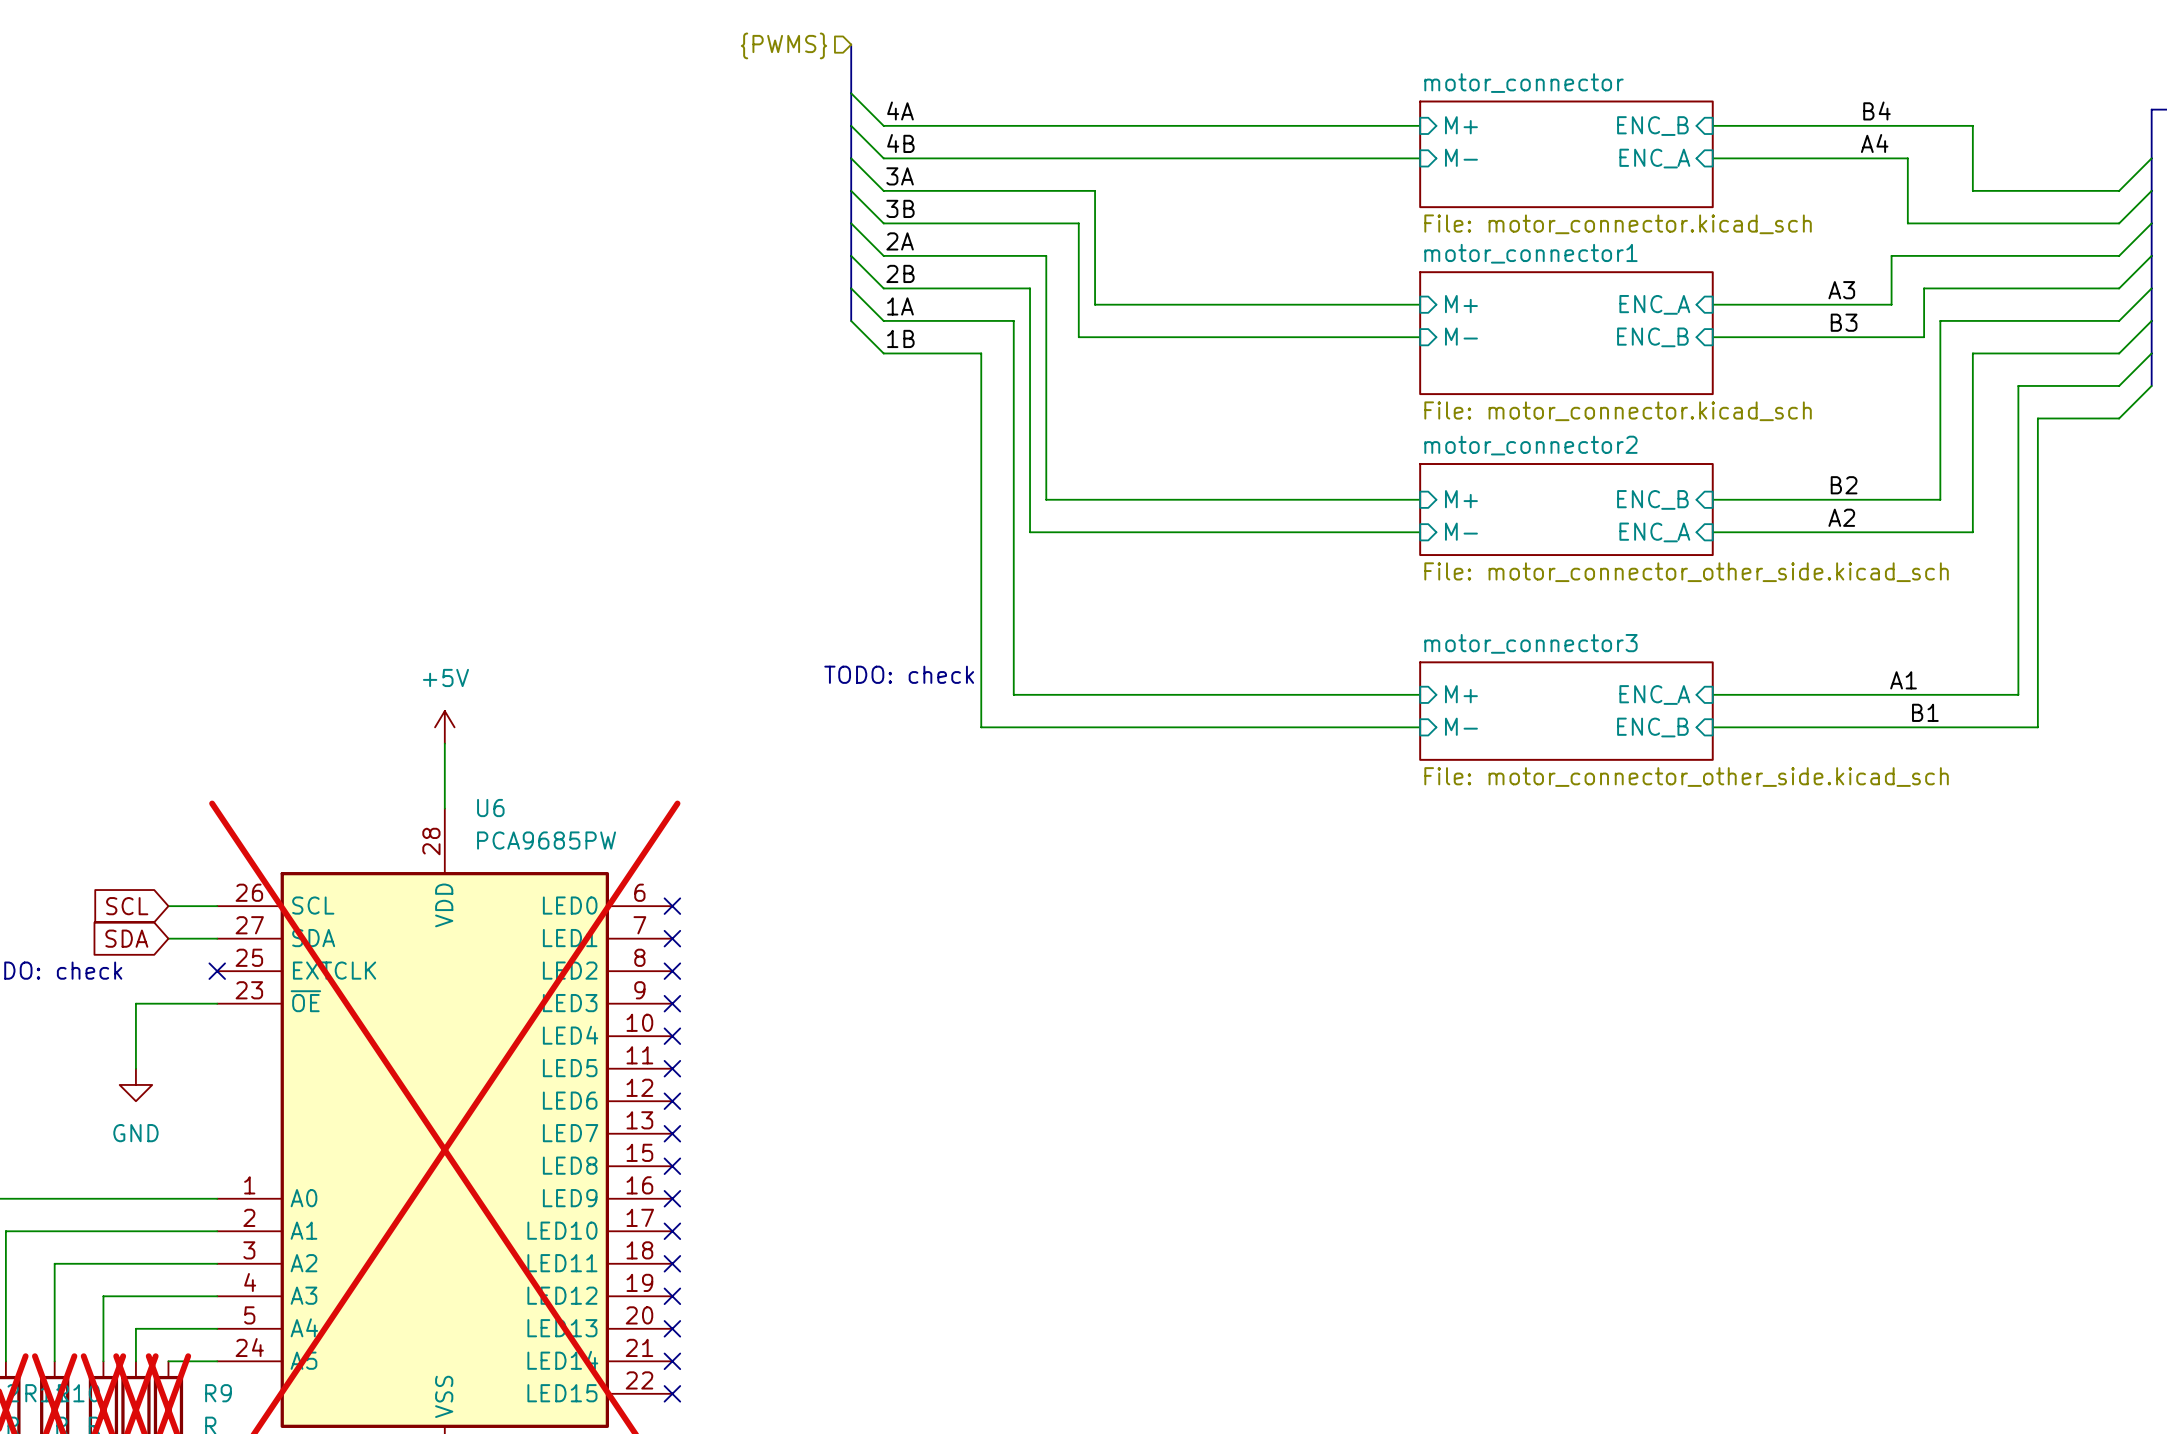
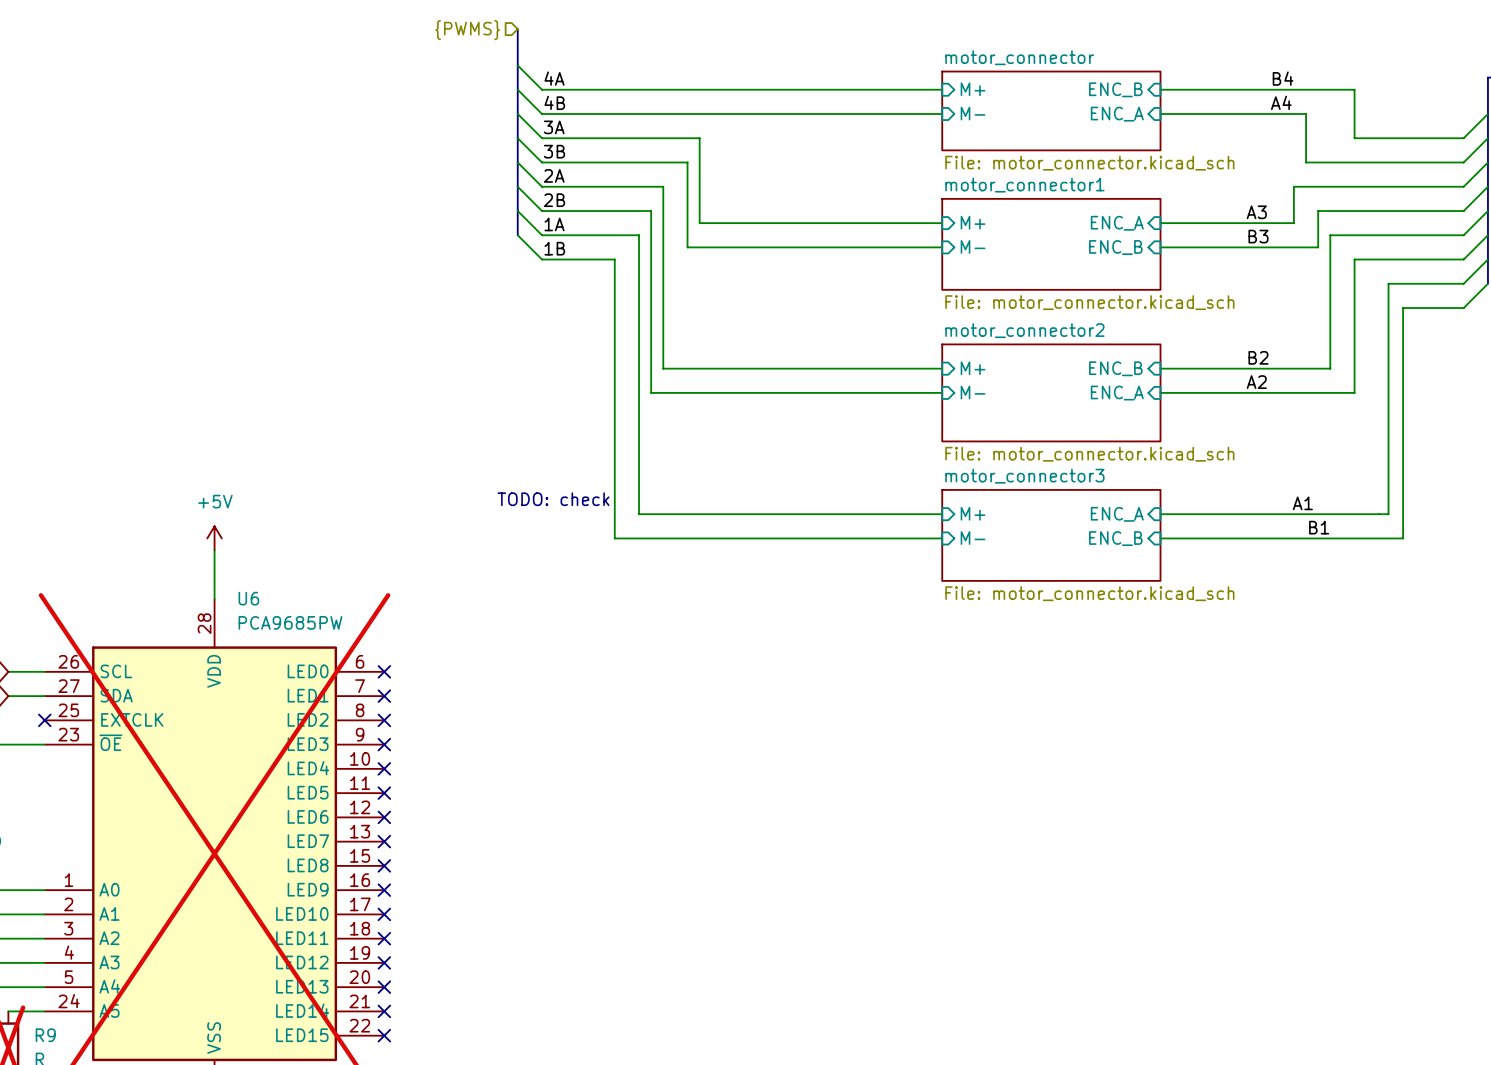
sheet motor_connector2 shape: [1419, 463, 1714, 557] -> [941, 343, 1162, 443]
sheet motor_connector2 value: File: motor_connector_other_side.kicad_sch (1686, 572) -> File: motor_connector.kicad_sch (1089, 454)
sheet motor_connector3 shape: [1419, 661, 1714, 761] -> [941, 489, 1162, 582]
sheet motor_connector3 value: File: motor_connector_other_side.kicad_sch (1686, 777) -> File: motor_connector.kicad_sch (1089, 593)

